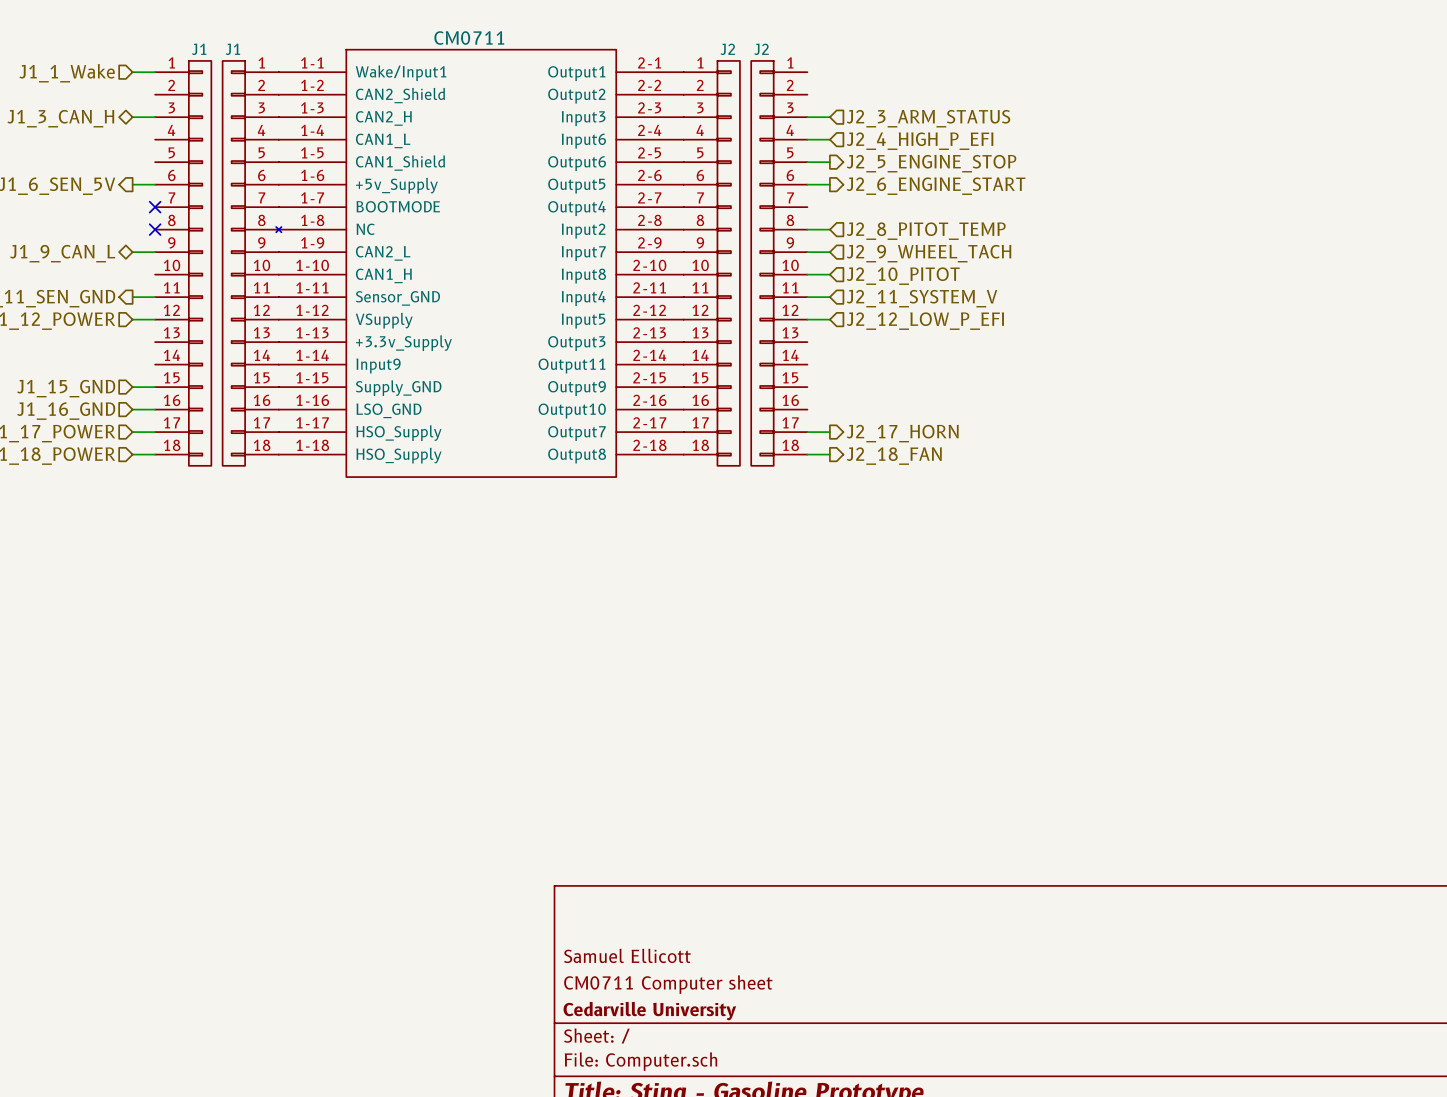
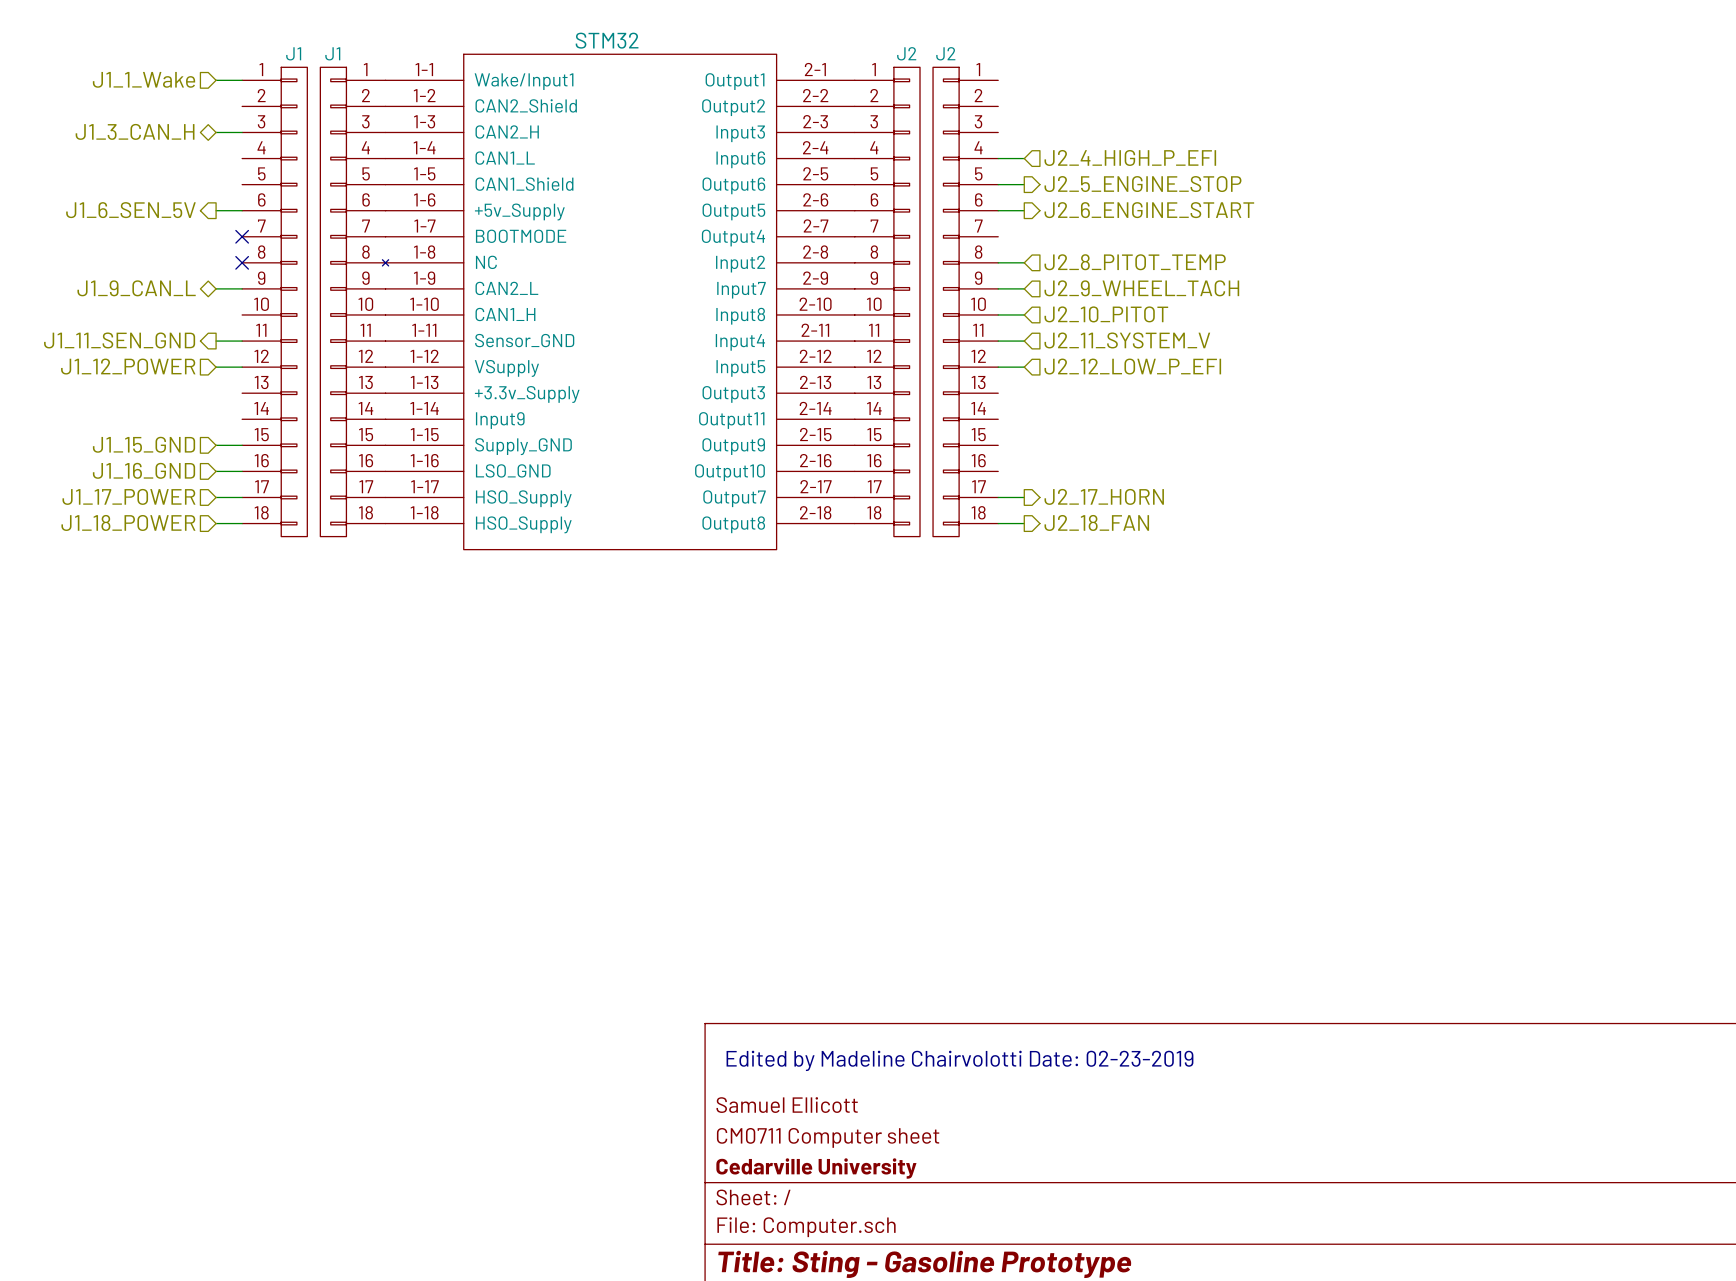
part value: CM0711 (469, 38) -> STM32 (607, 40)
wire: (807, 117) (829, 117) -> none
hierarchical label: J2_3_ARM_STATUS (928, 118) -> none
text: none -> Edited by Madeline Chairvolotti Date: 02-23-2019 (959, 1060)

